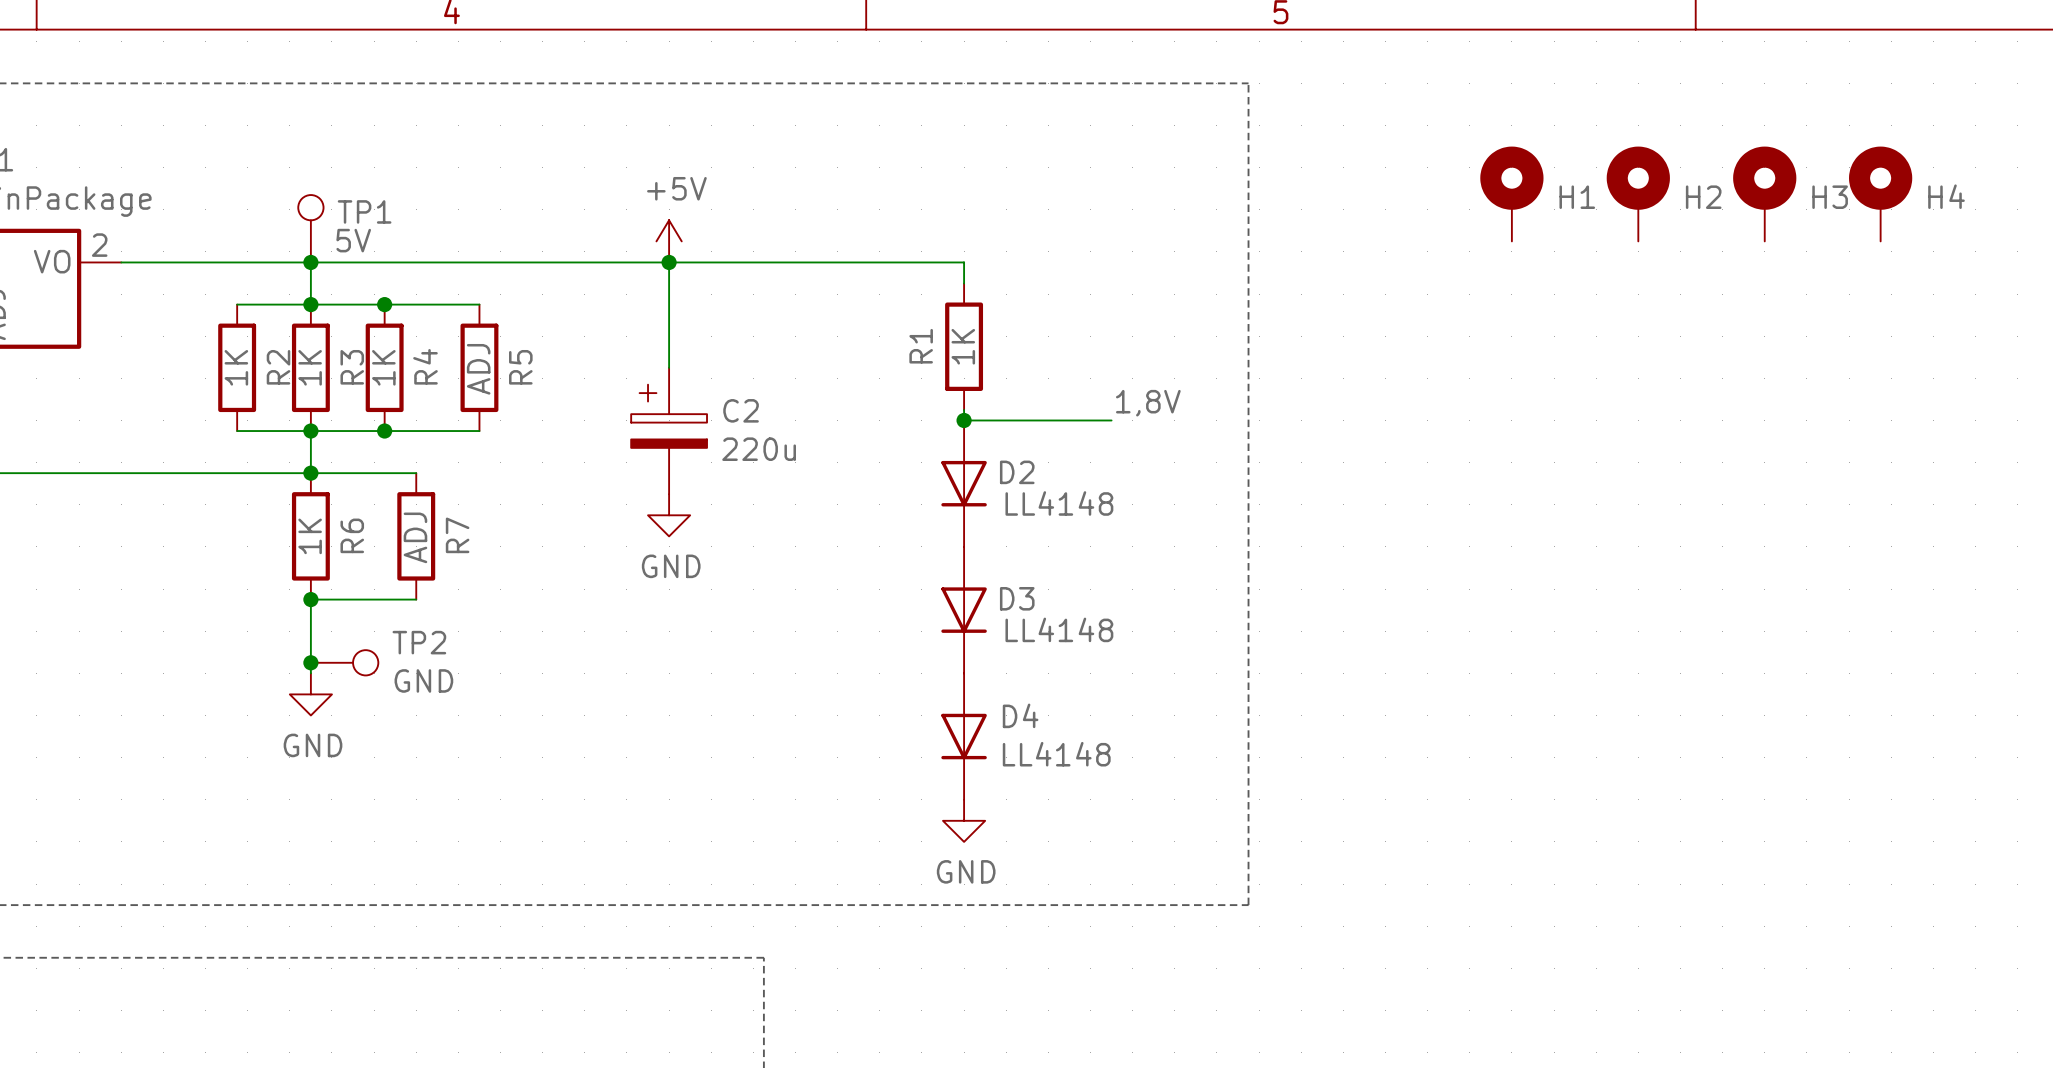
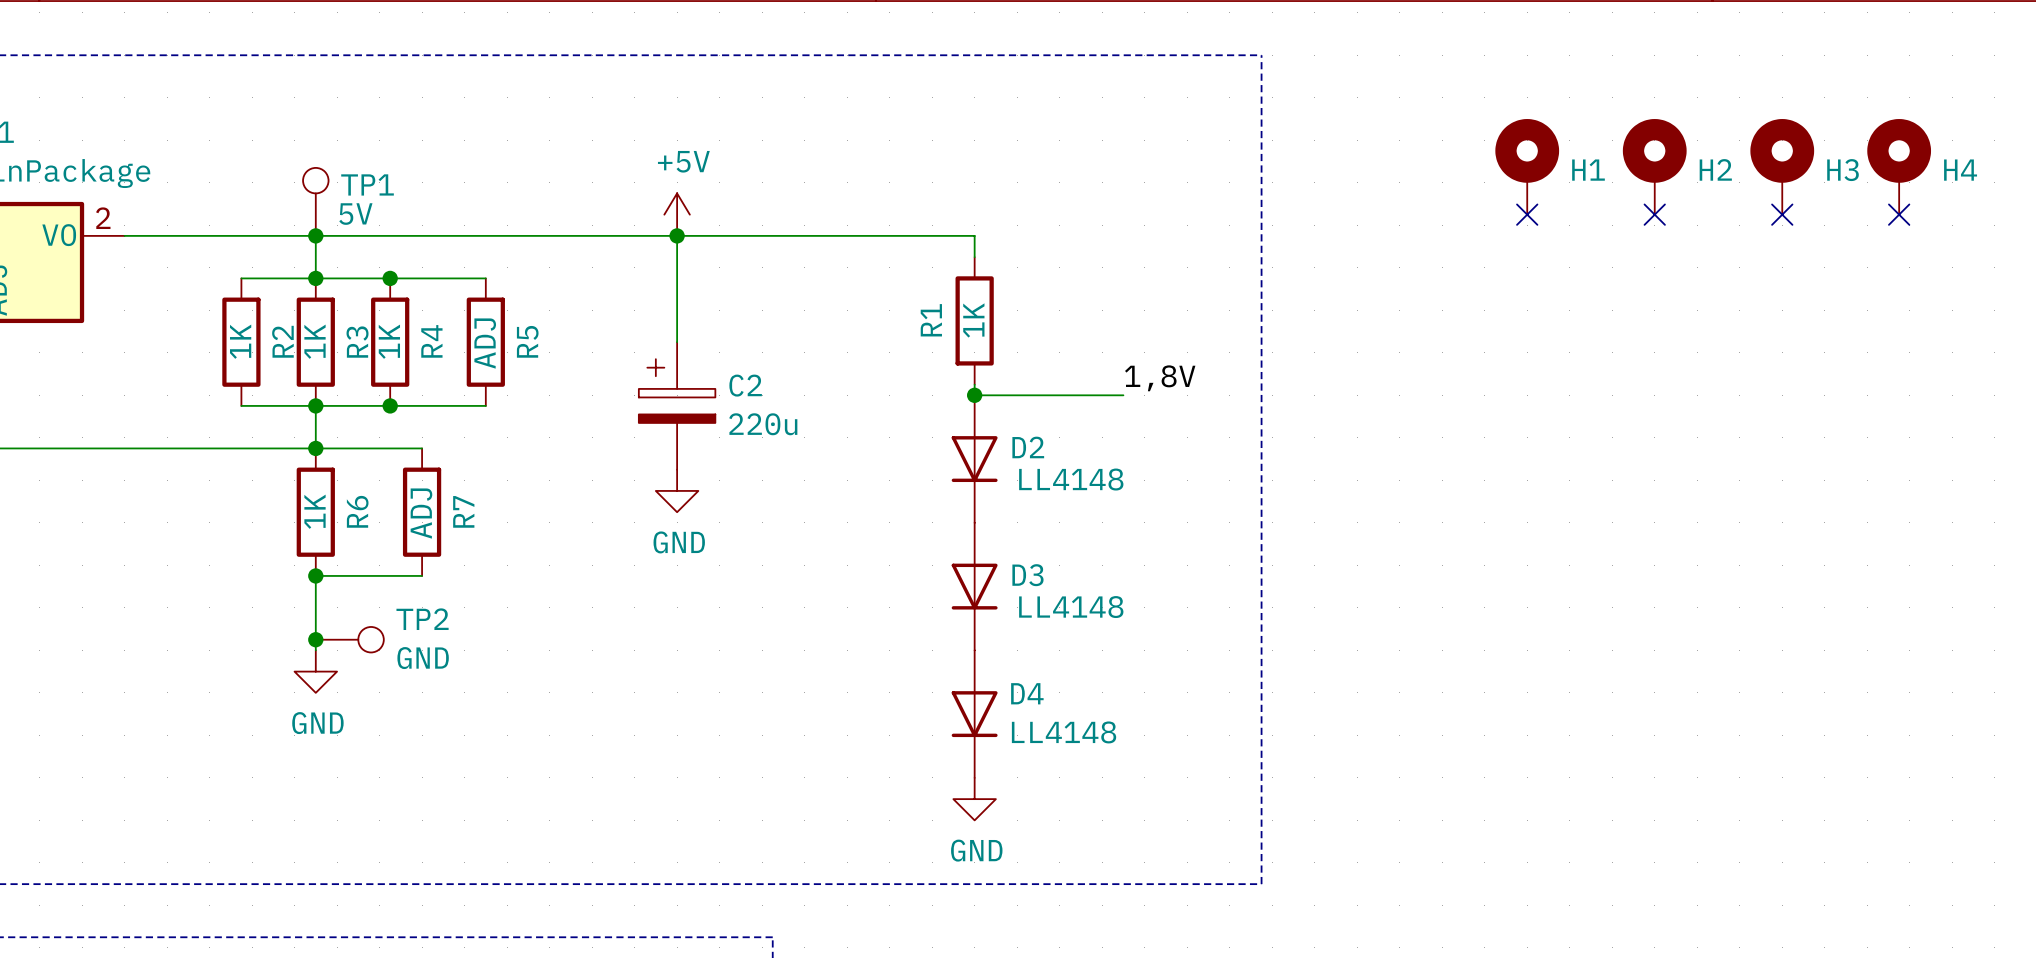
no-connect mark: none -> (1527, 214)
no-connect mark: none -> (1654, 214)
no-connect mark: none -> (1782, 214)
no-connect mark: none -> (1899, 214)

